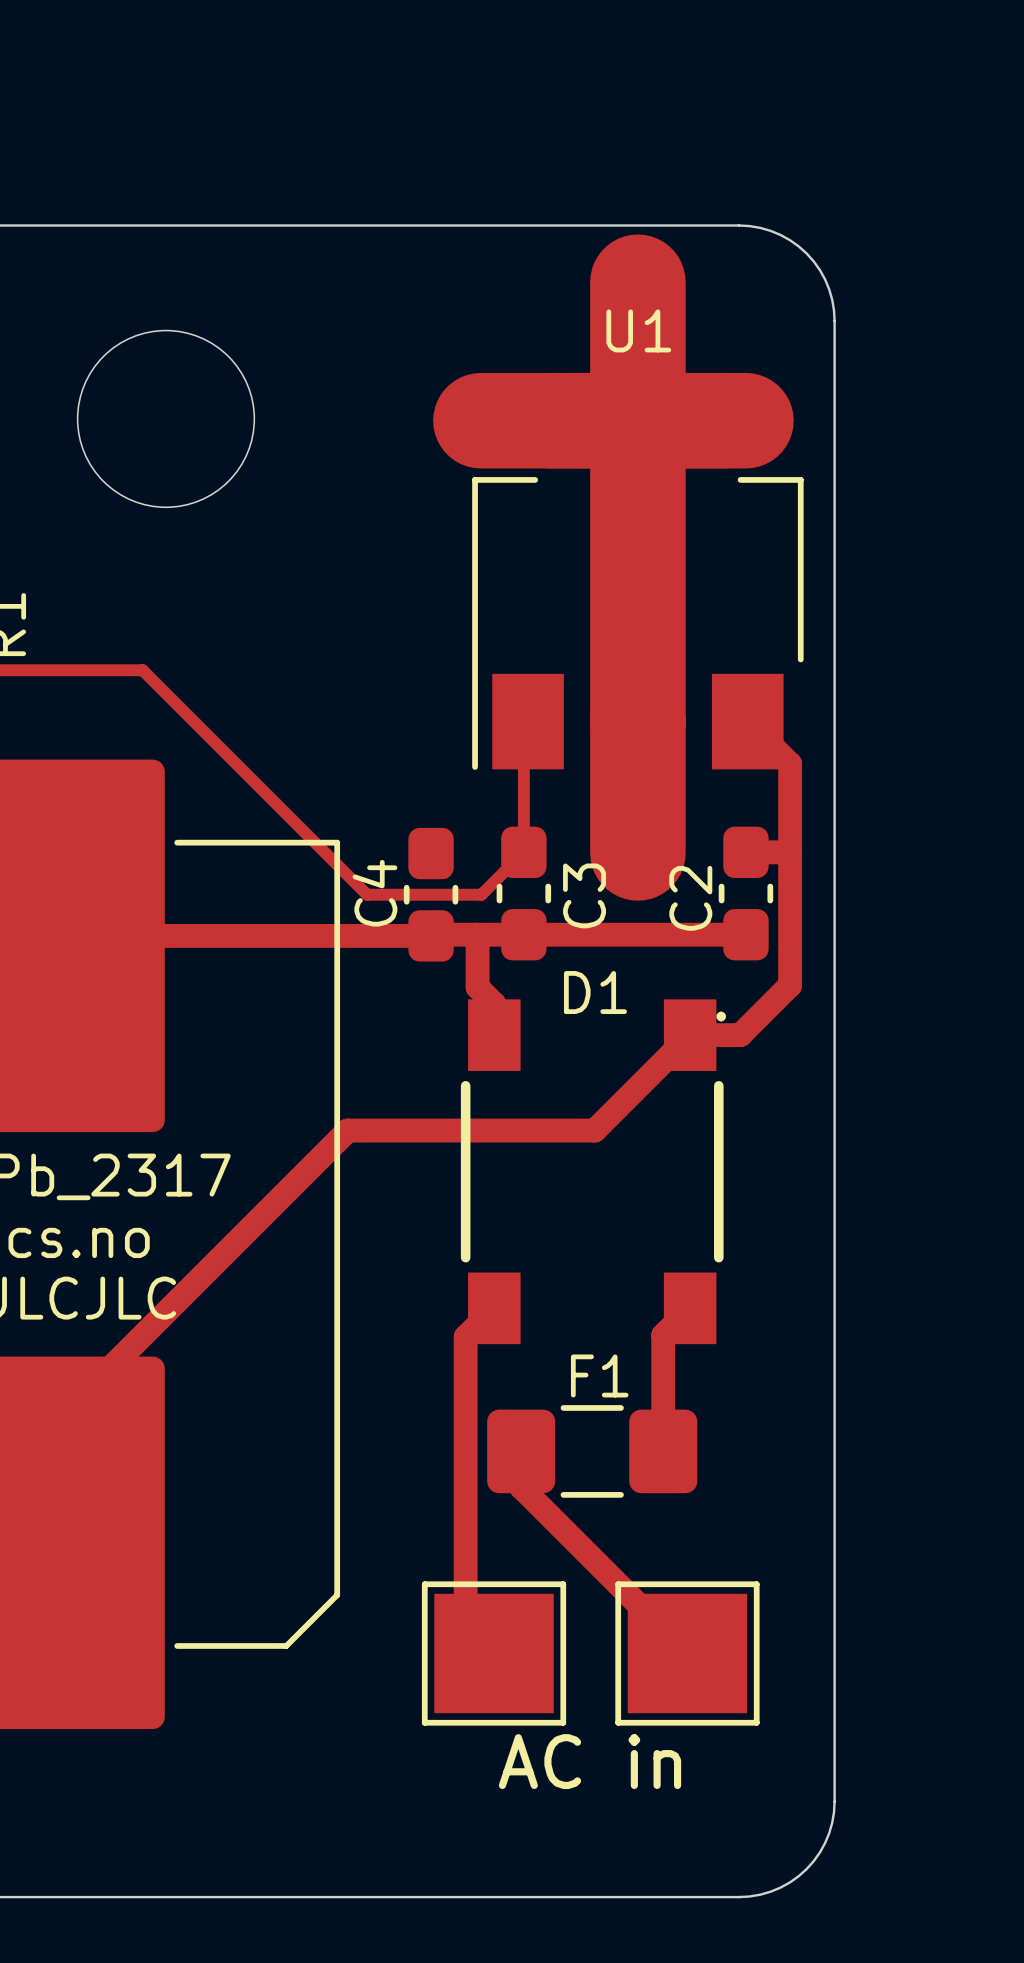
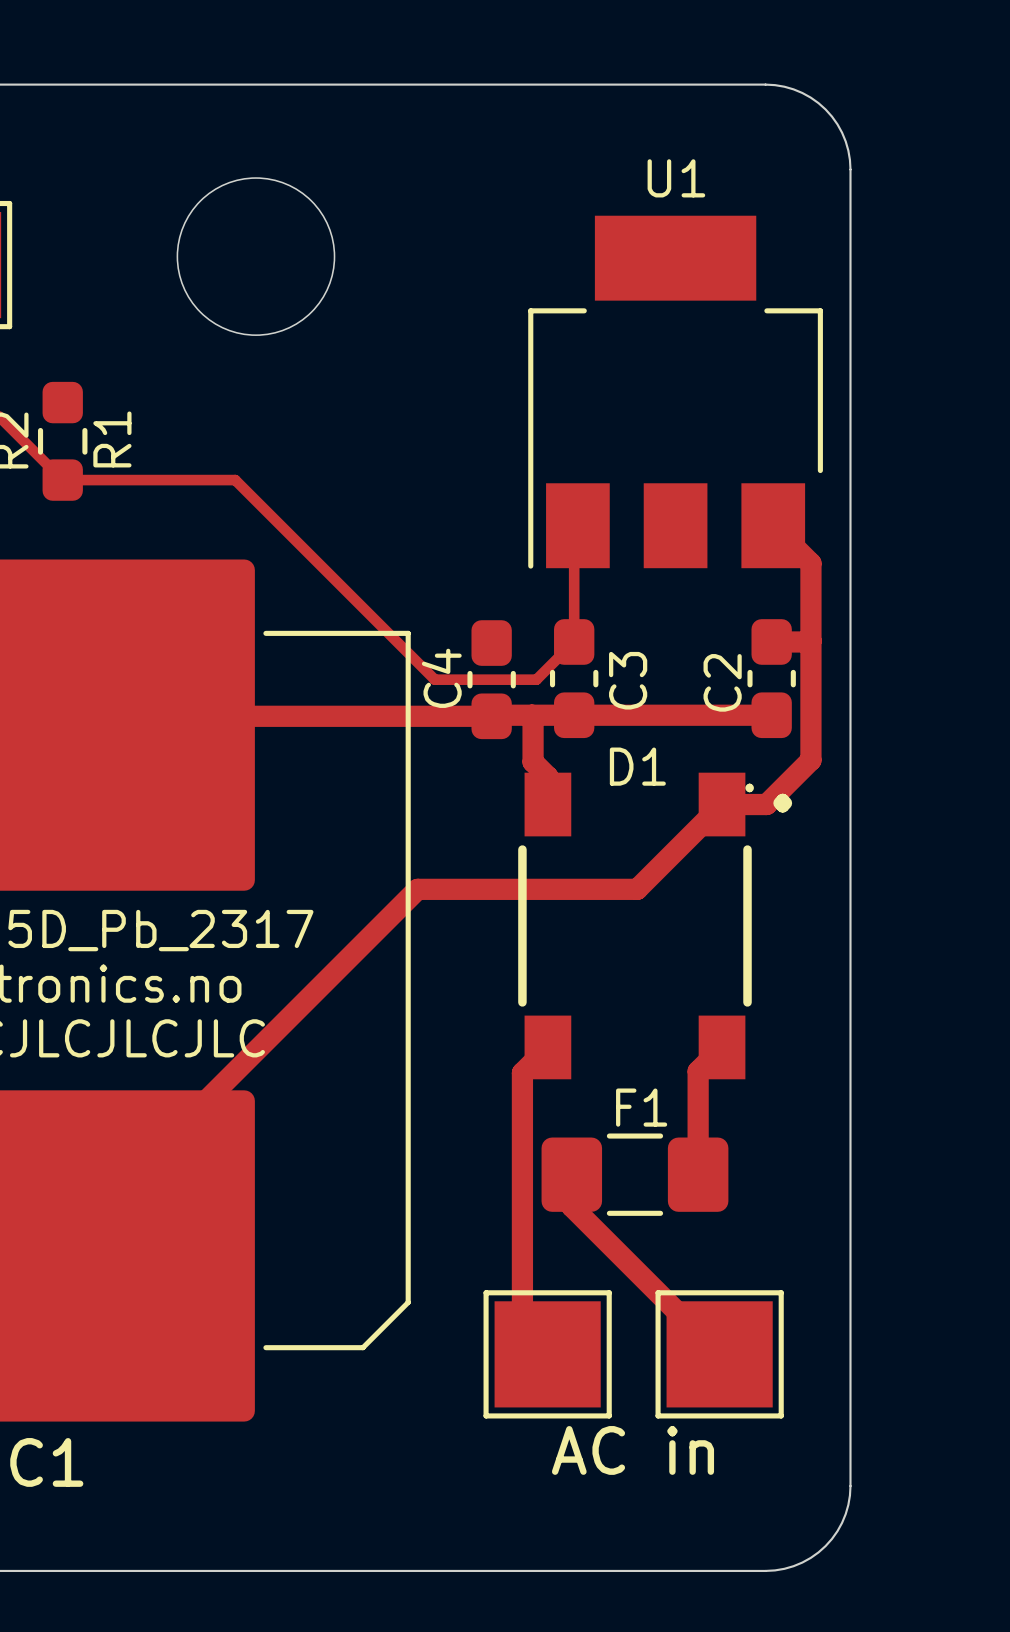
top track: (637, 282) (637, 852) -> none
top track: (480, 420) (745, 420) -> none
top track: (607, 420) (607, 721) -> none
text: none -> . (782, 803)

